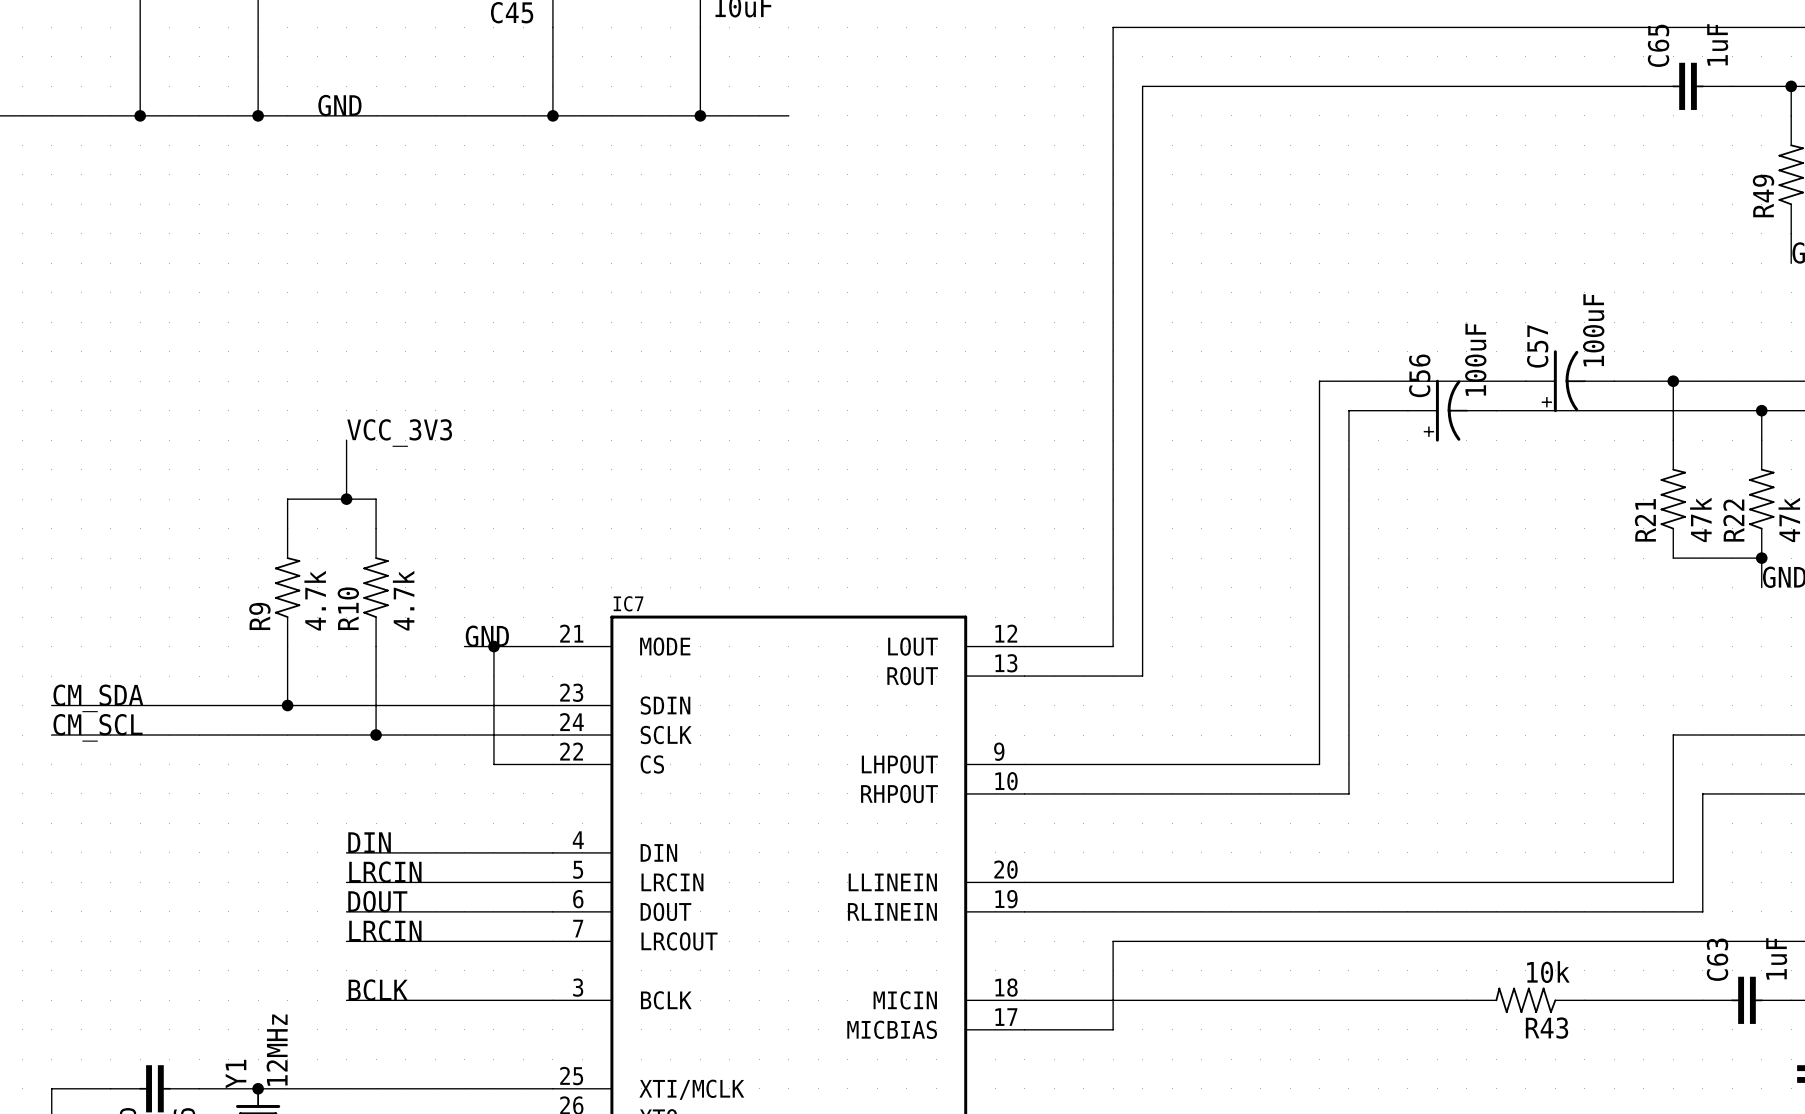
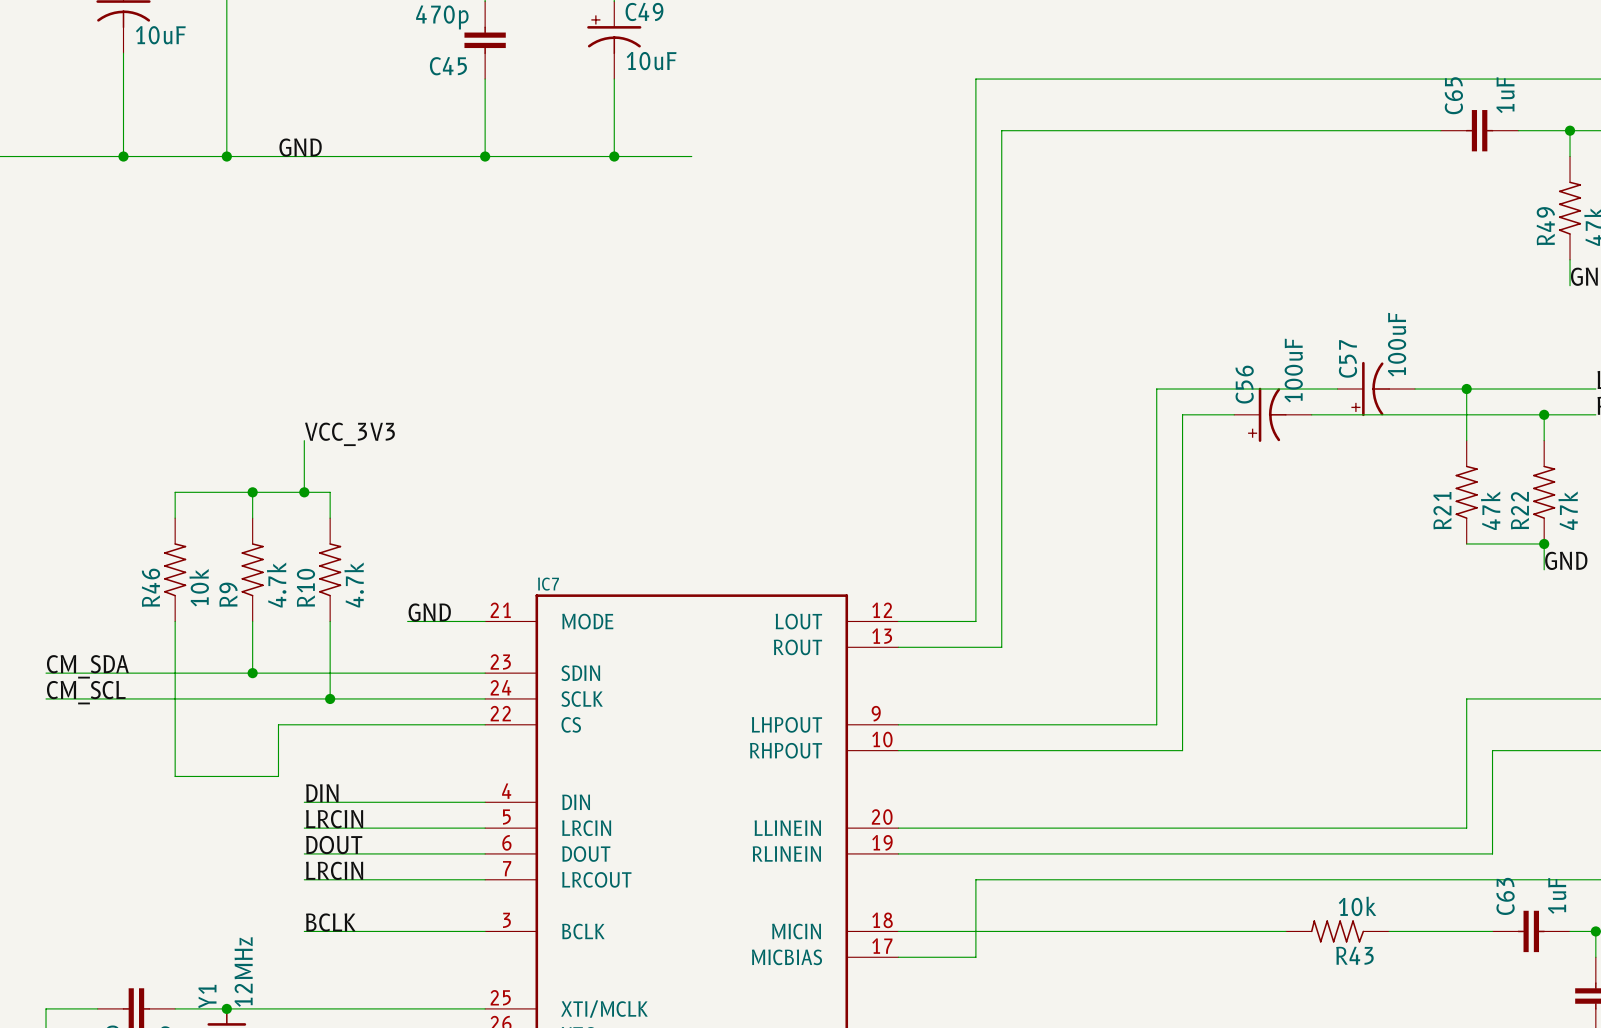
wire: none -> (252, 492) (175, 492) (175, 518)
junction: none -> (252, 492)
R46: none -> 10k (175, 569)
wire: (493, 646) (493, 764) -> (175, 621) (175, 776) (278, 776) (278, 724) (433, 724)
junction: (493, 646) -> none

